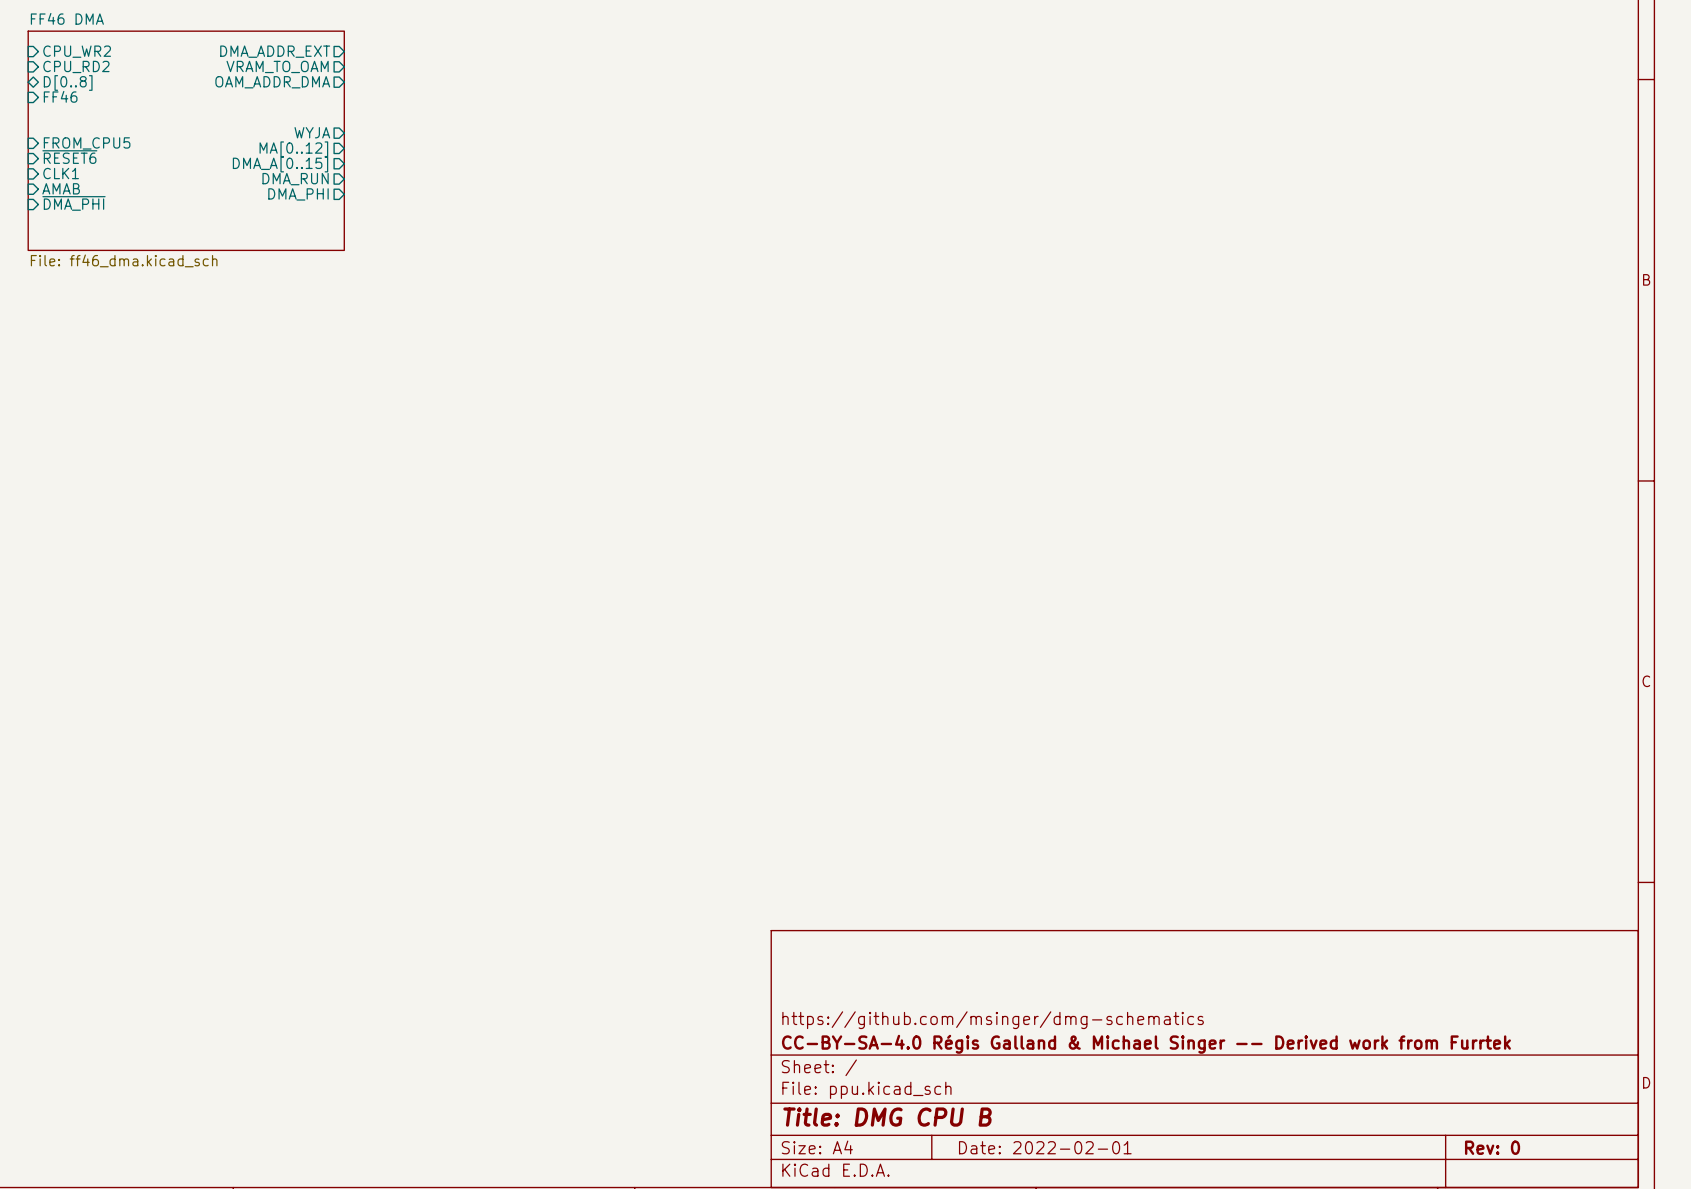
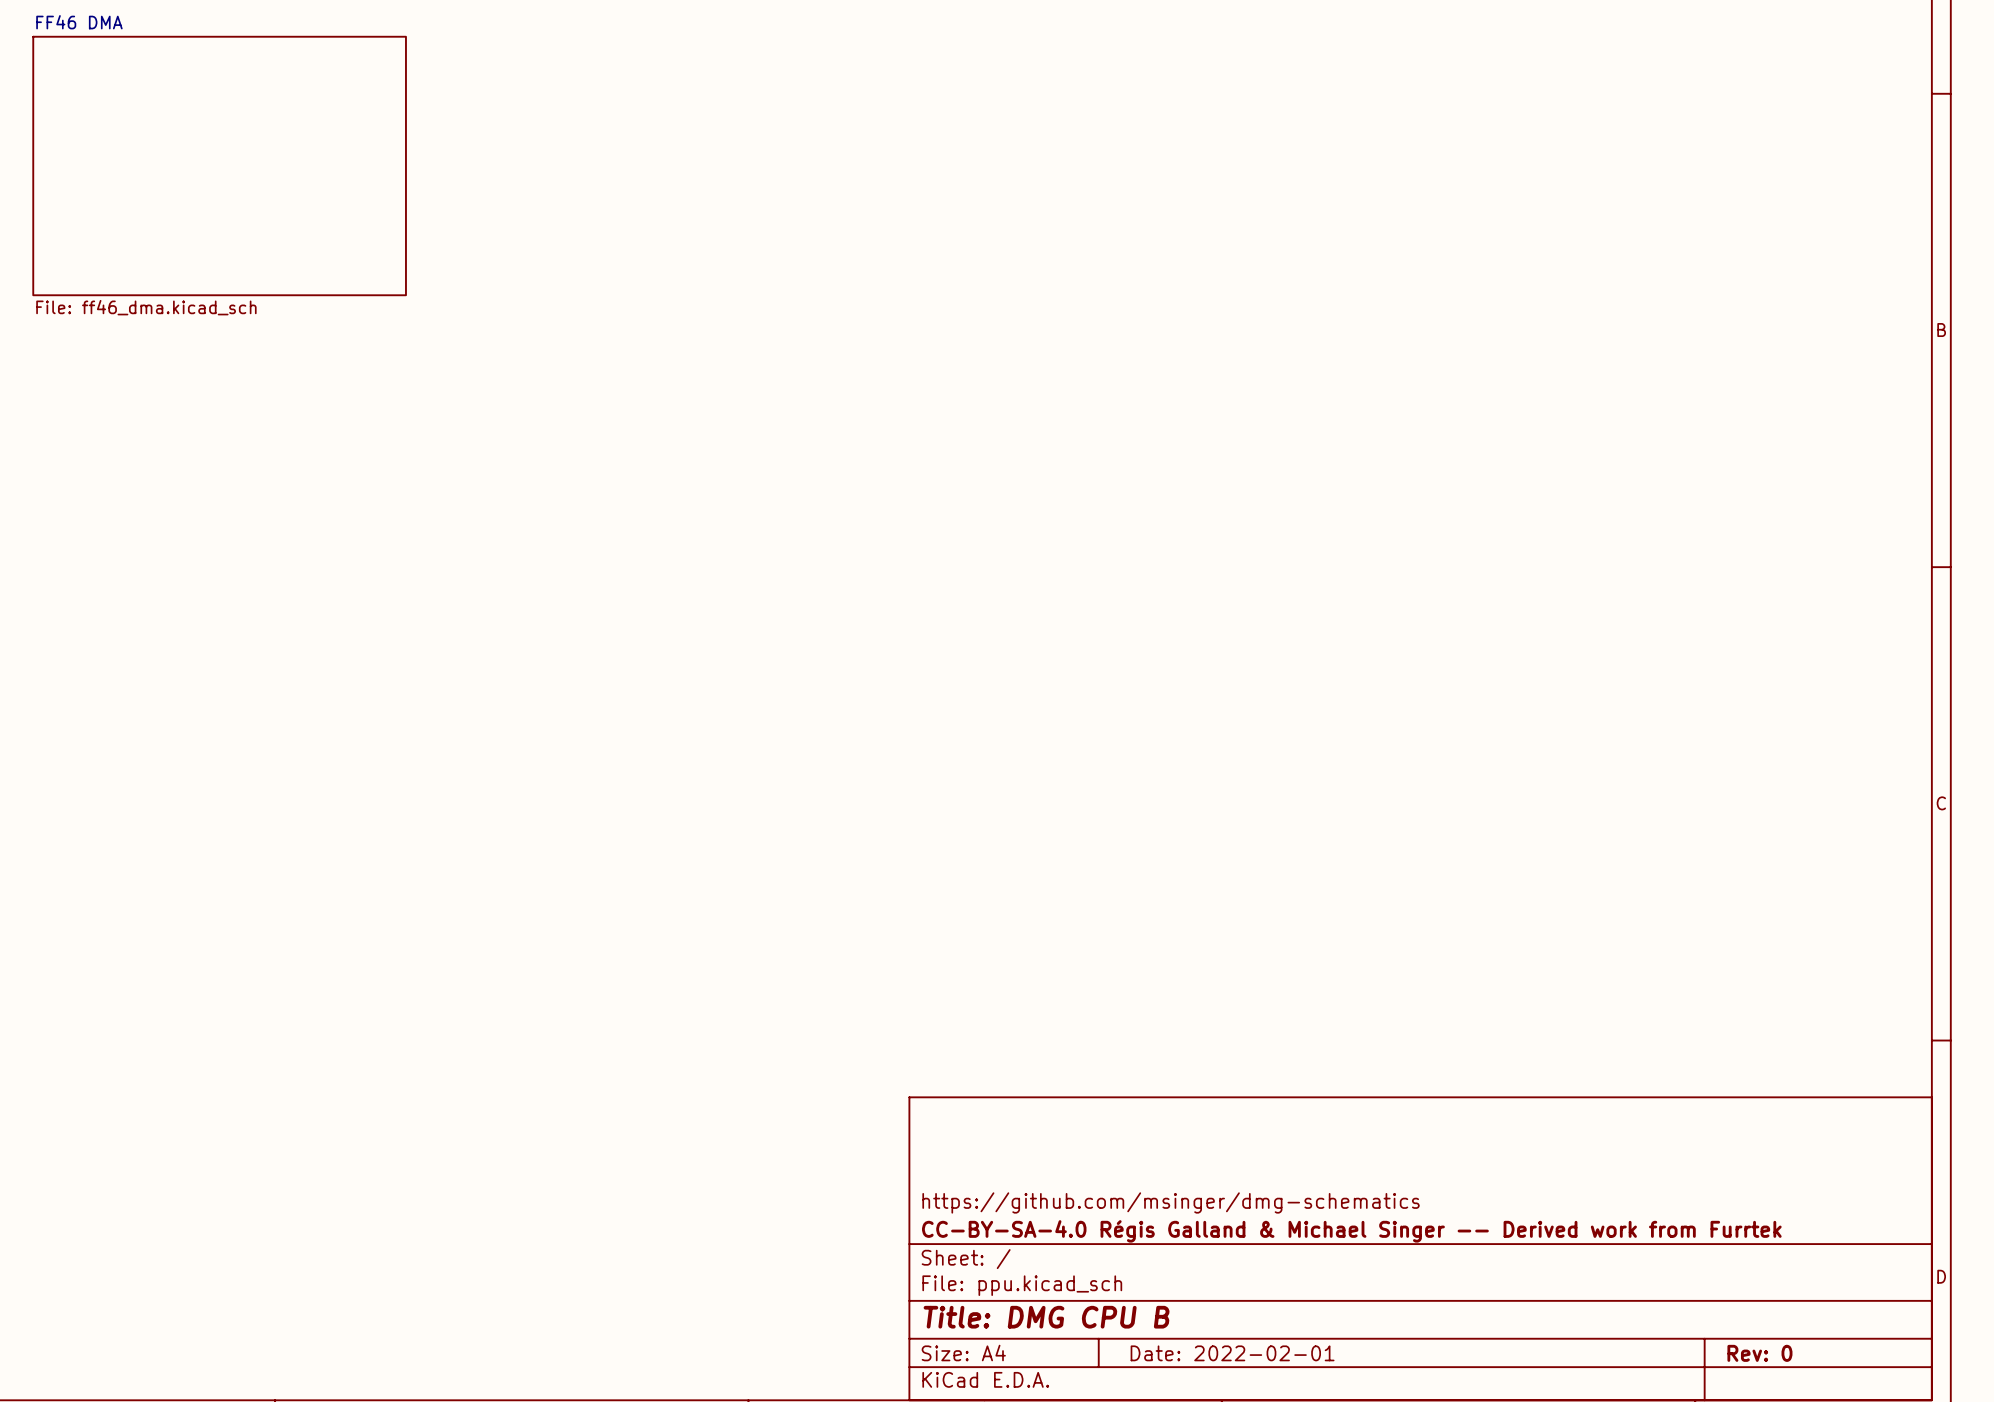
sheet pin: CPU_WR2 (77, 51) -> none
sheet pin: DMA_ADDR_EXT (275, 51) -> none
sheet pin: CPU_RD2 (76, 66) -> none
sheet pin: VRAM_TO_OAM (277, 66) -> none
sheet pin: D[0..8] (68, 82) -> none
sheet pin: OAM_ADDR_DMA (272, 82) -> none
sheet pin: FF46 (60, 96) -> none
sheet pin: WYJA (312, 132) -> none
sheet pin: FROM_CPU5 (87, 143) -> none
sheet pin: MA[0..12] (293, 149) -> none
sheet pin: ~{RESET6} (69, 157) -> none
sheet pin: DMA_A[0..15] (280, 164) -> none
sheet pin: CLK1 (61, 173) -> none
sheet pin: DMA_RUN (295, 179) -> none
sheet pin: AMAB (61, 188) -> none
sheet pin: DMA_PHI (298, 194) -> none
sheet pin: ~{DMA_PHI} (73, 203) -> none

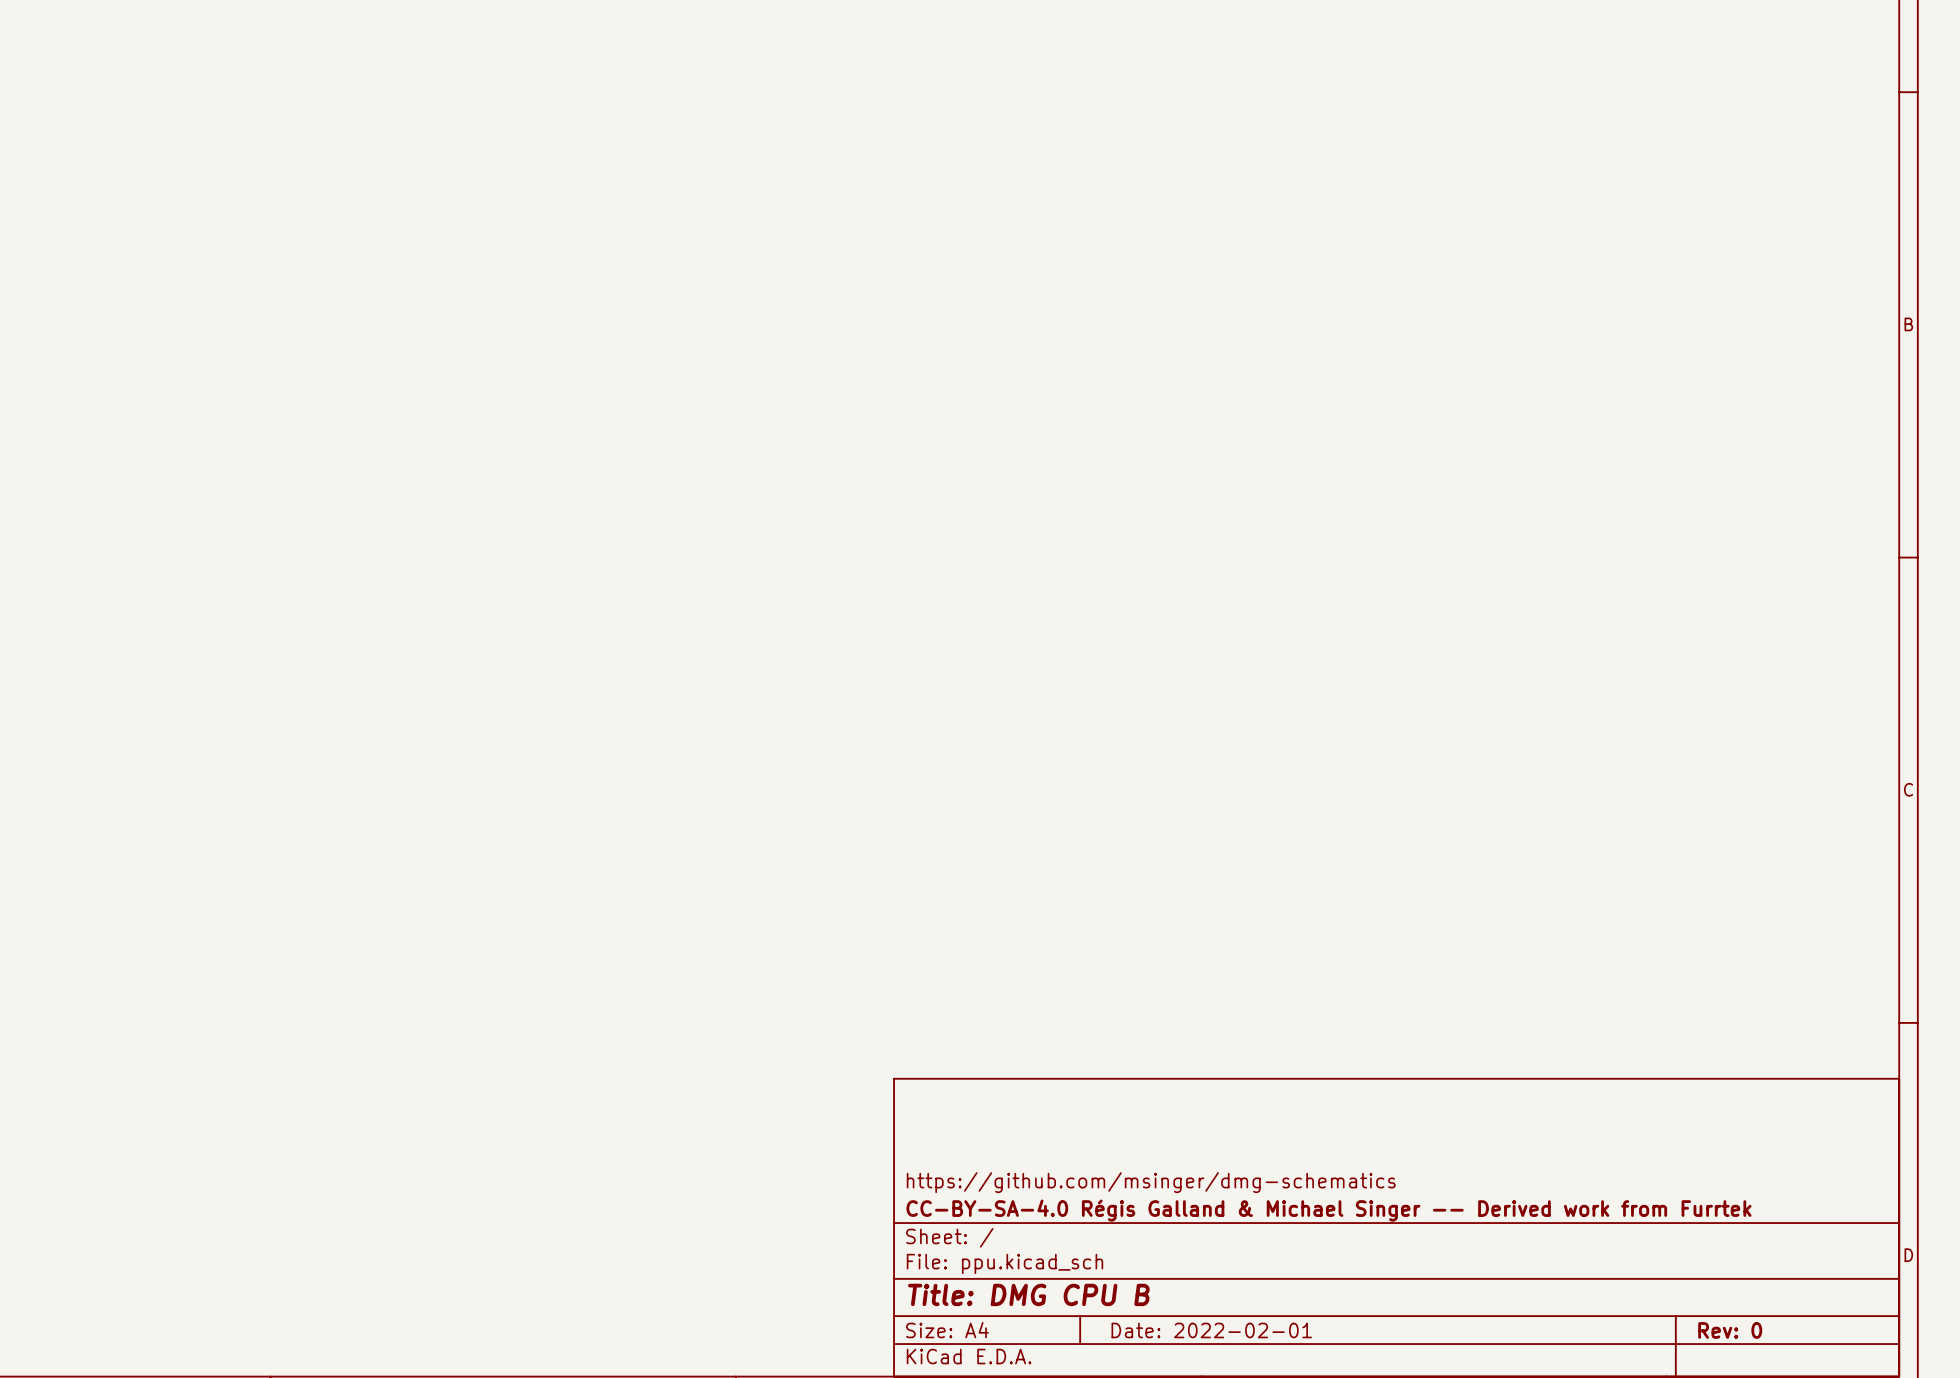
sheet FF46 DMA: File: ff46_dma.kicad_sch (219, 166) -> none

